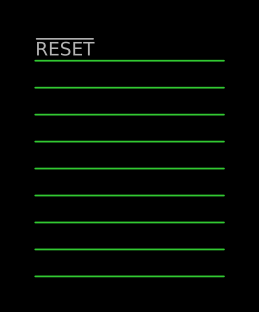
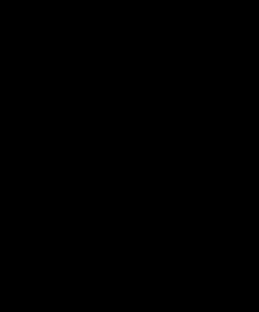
label: ~{RESET} (65, 47) -> none
wire: (35, 60) (223, 60) -> none
wire: (35, 87) (223, 87) -> none
wire: (35, 114) (223, 114) -> none
wire: (35, 141) (223, 141) -> none
wire: (35, 168) (223, 168) -> none
wire: (35, 195) (223, 195) -> none
wire: (35, 222) (223, 222) -> none
wire: (35, 249) (223, 249) -> none
wire: (35, 276) (223, 276) -> none

